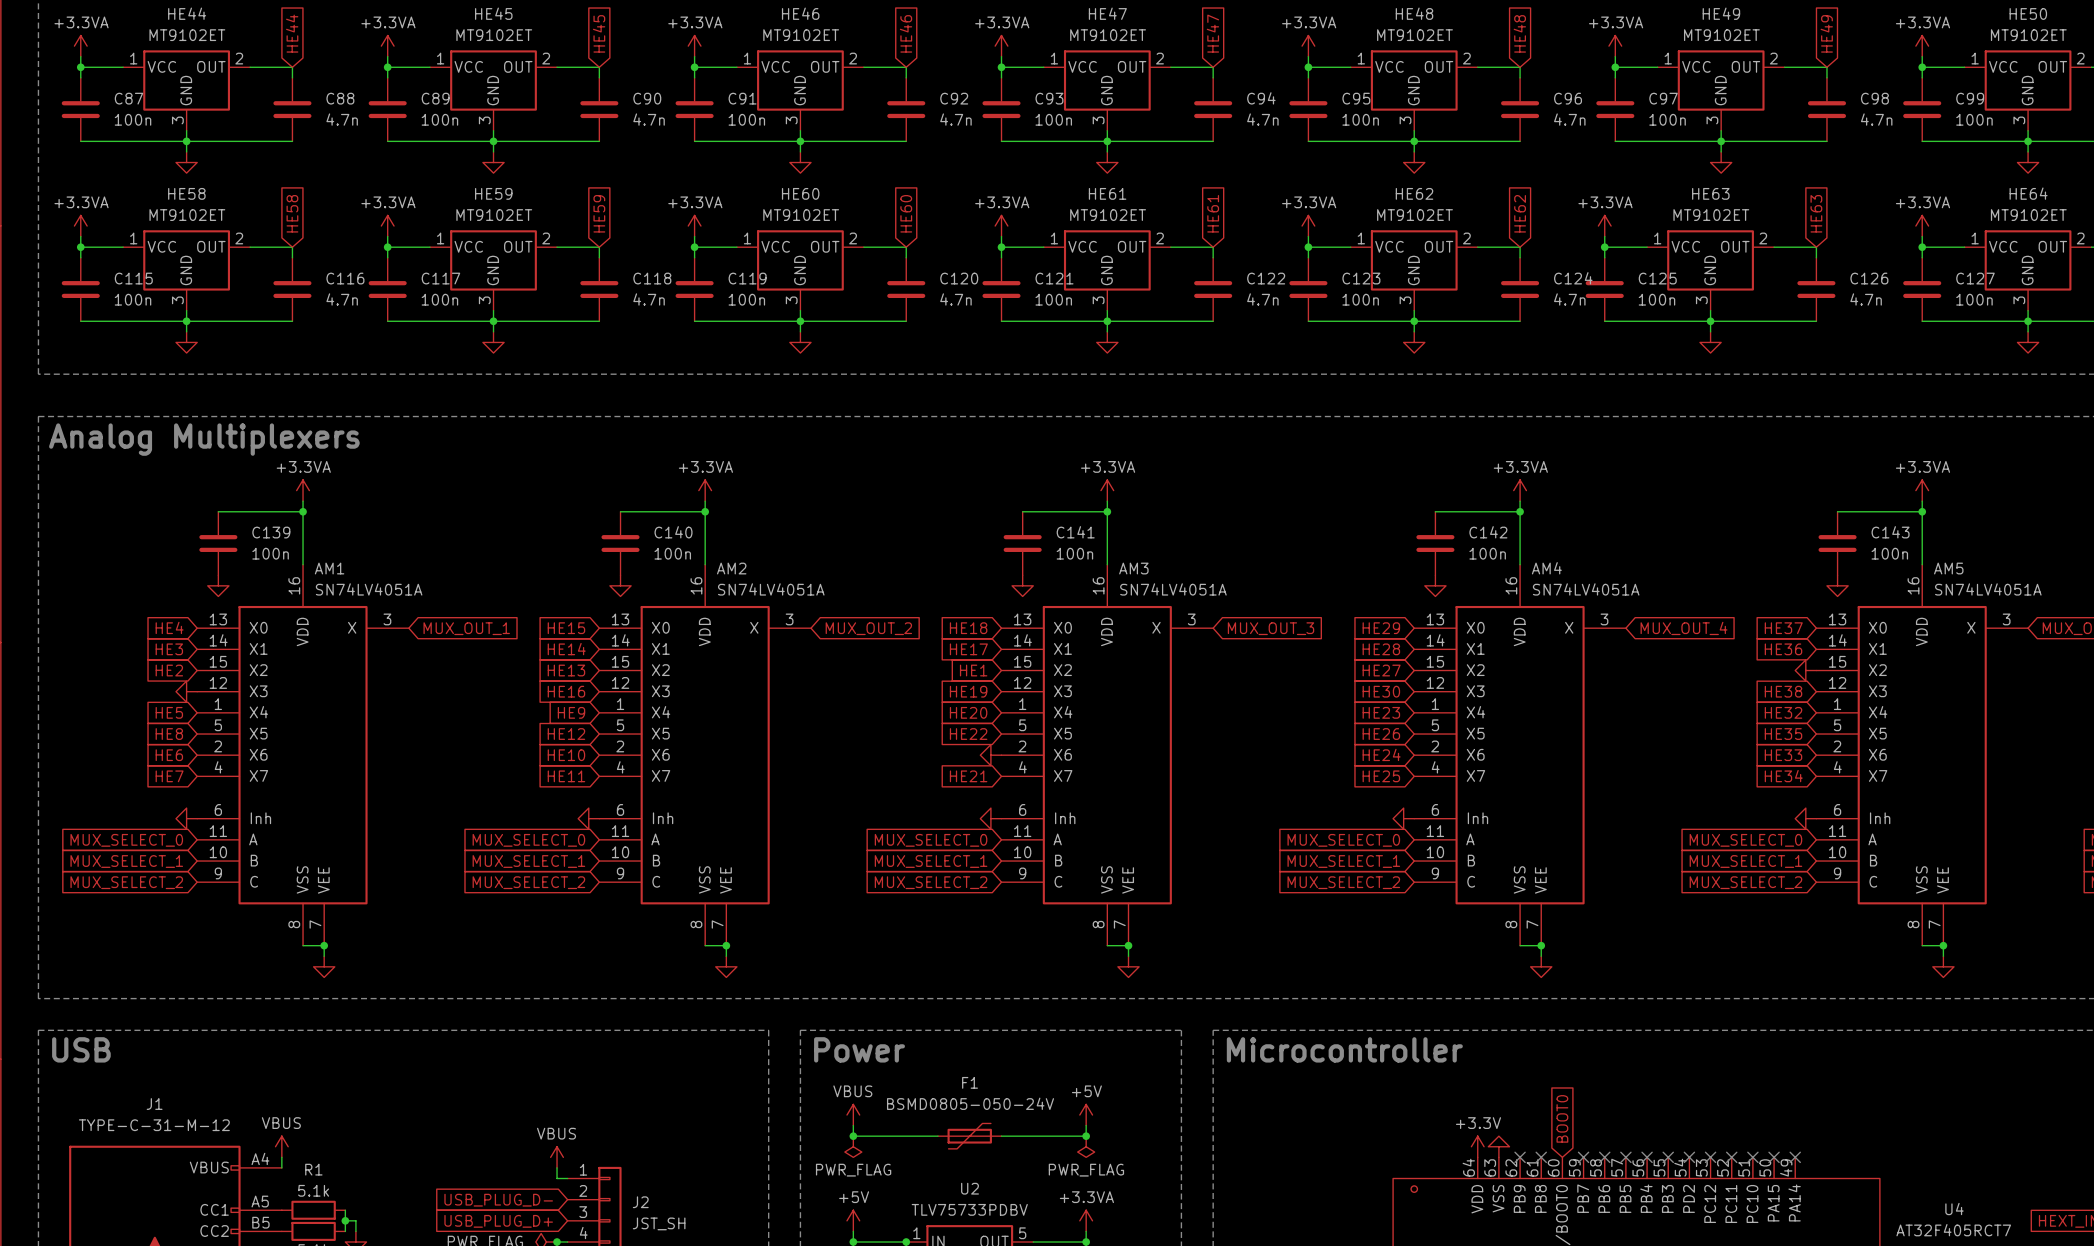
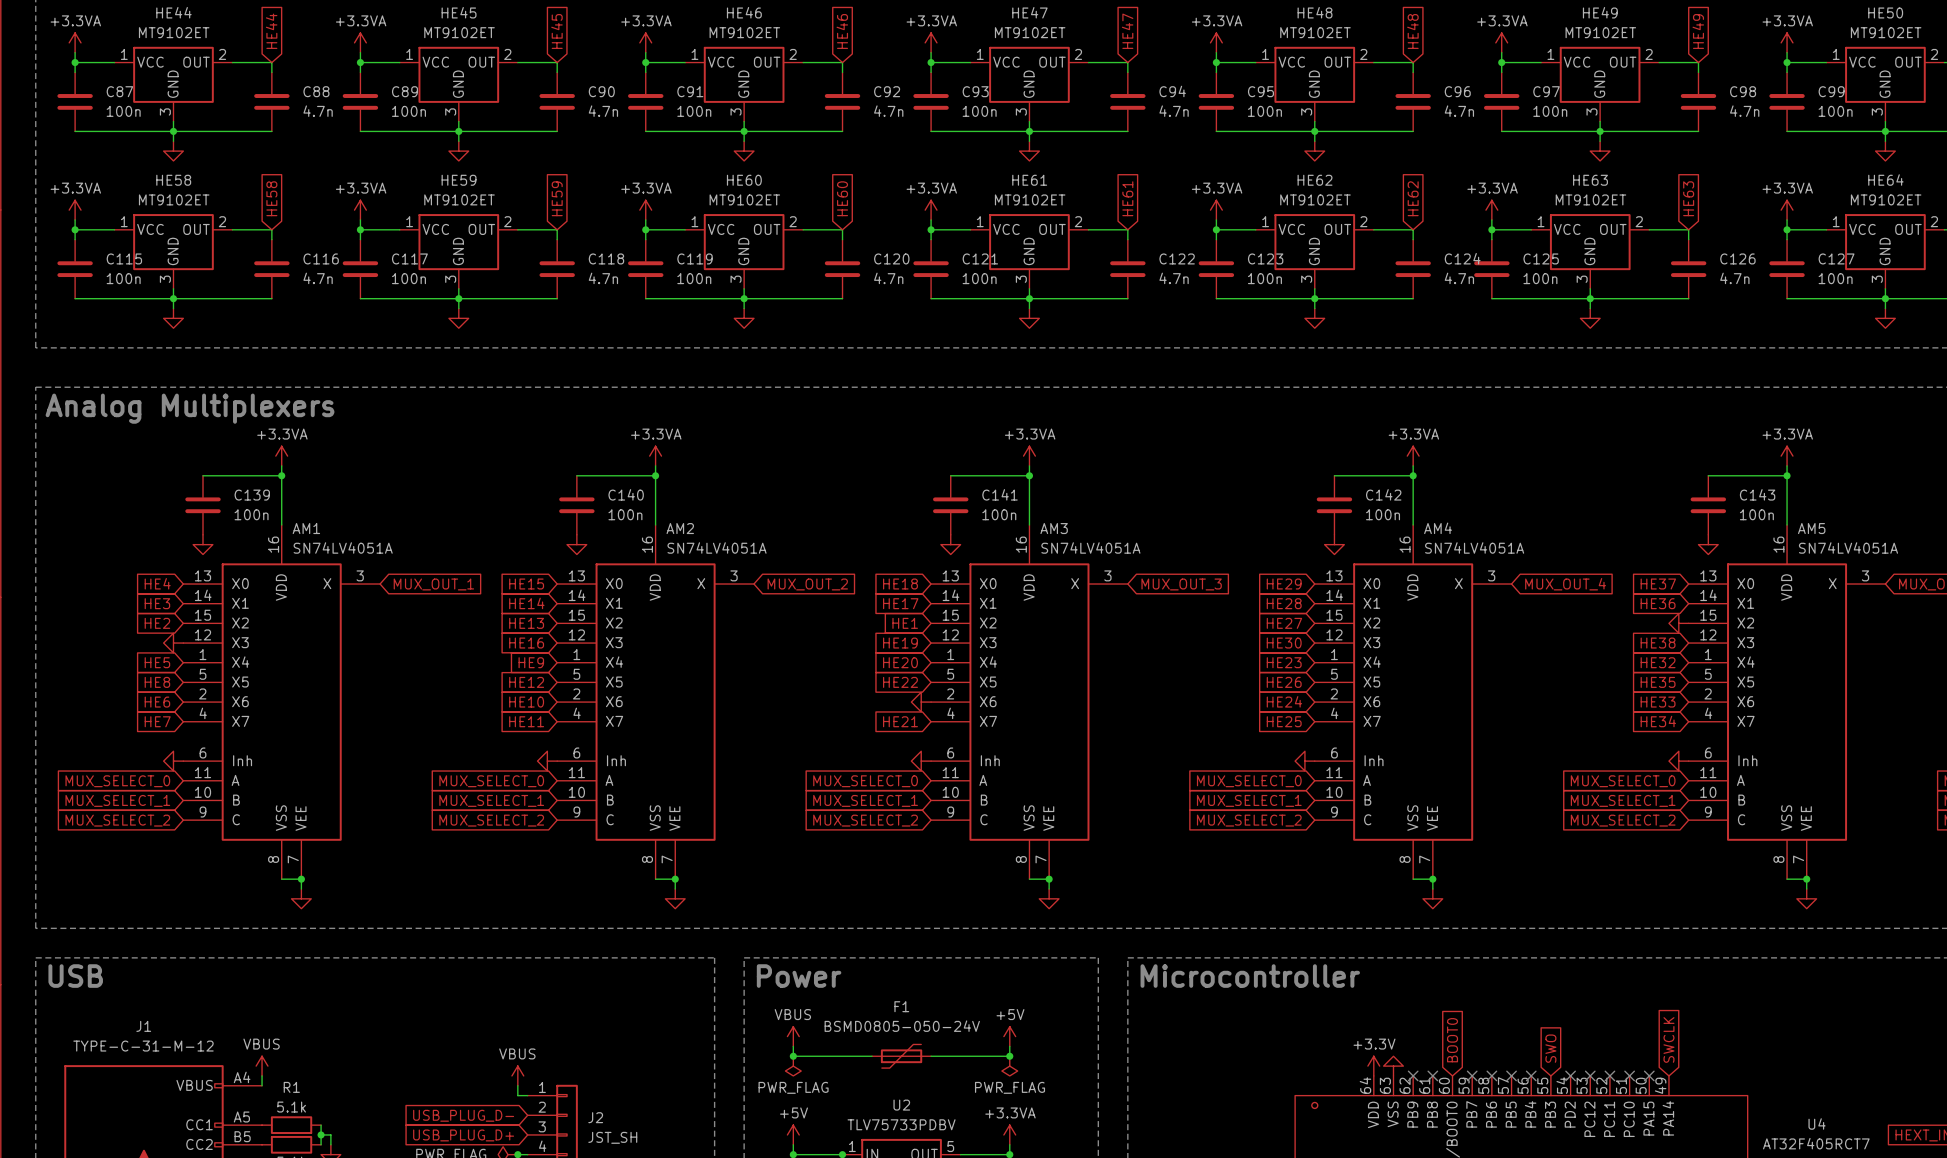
global label: none -> SWCLK (1668, 1039)
global label: none -> SWO (1550, 1048)
no-connect mark: (1668, 1157) -> none
no-connect mark: (1795, 1157) -> none

